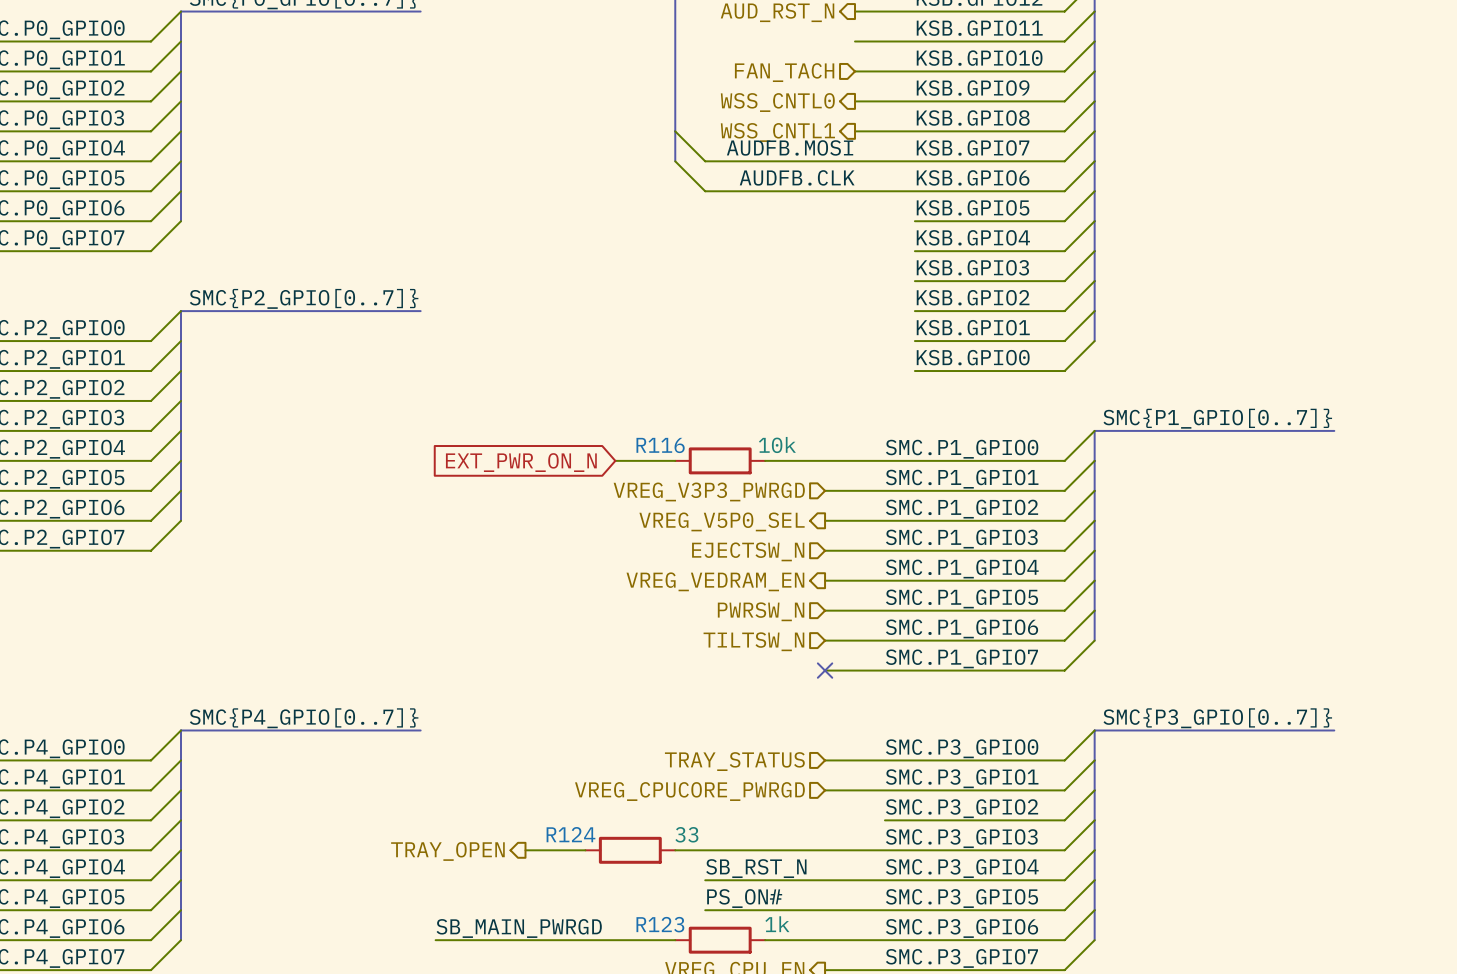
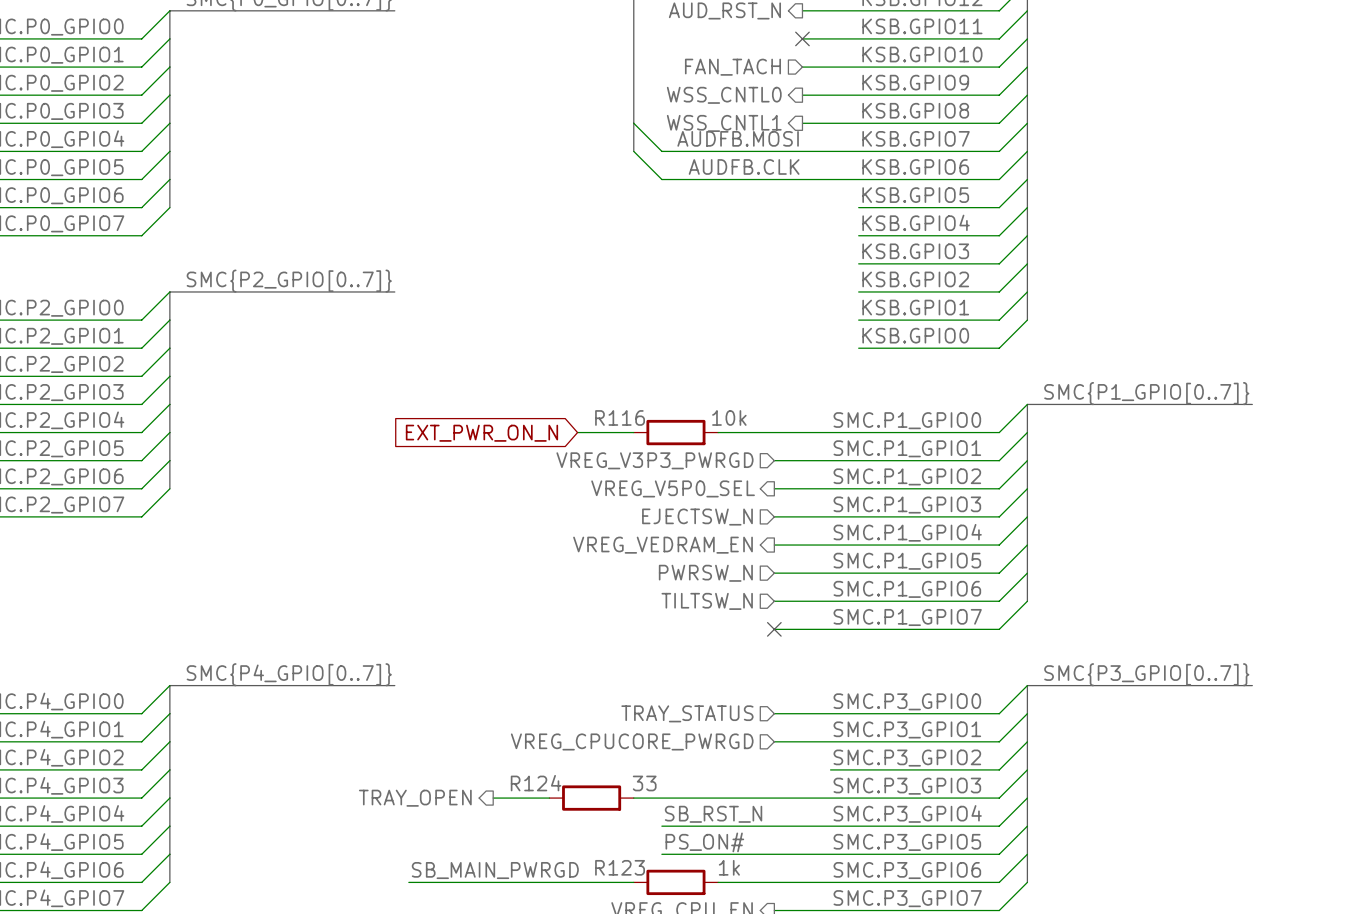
no-connect mark: none -> (802, 38)

